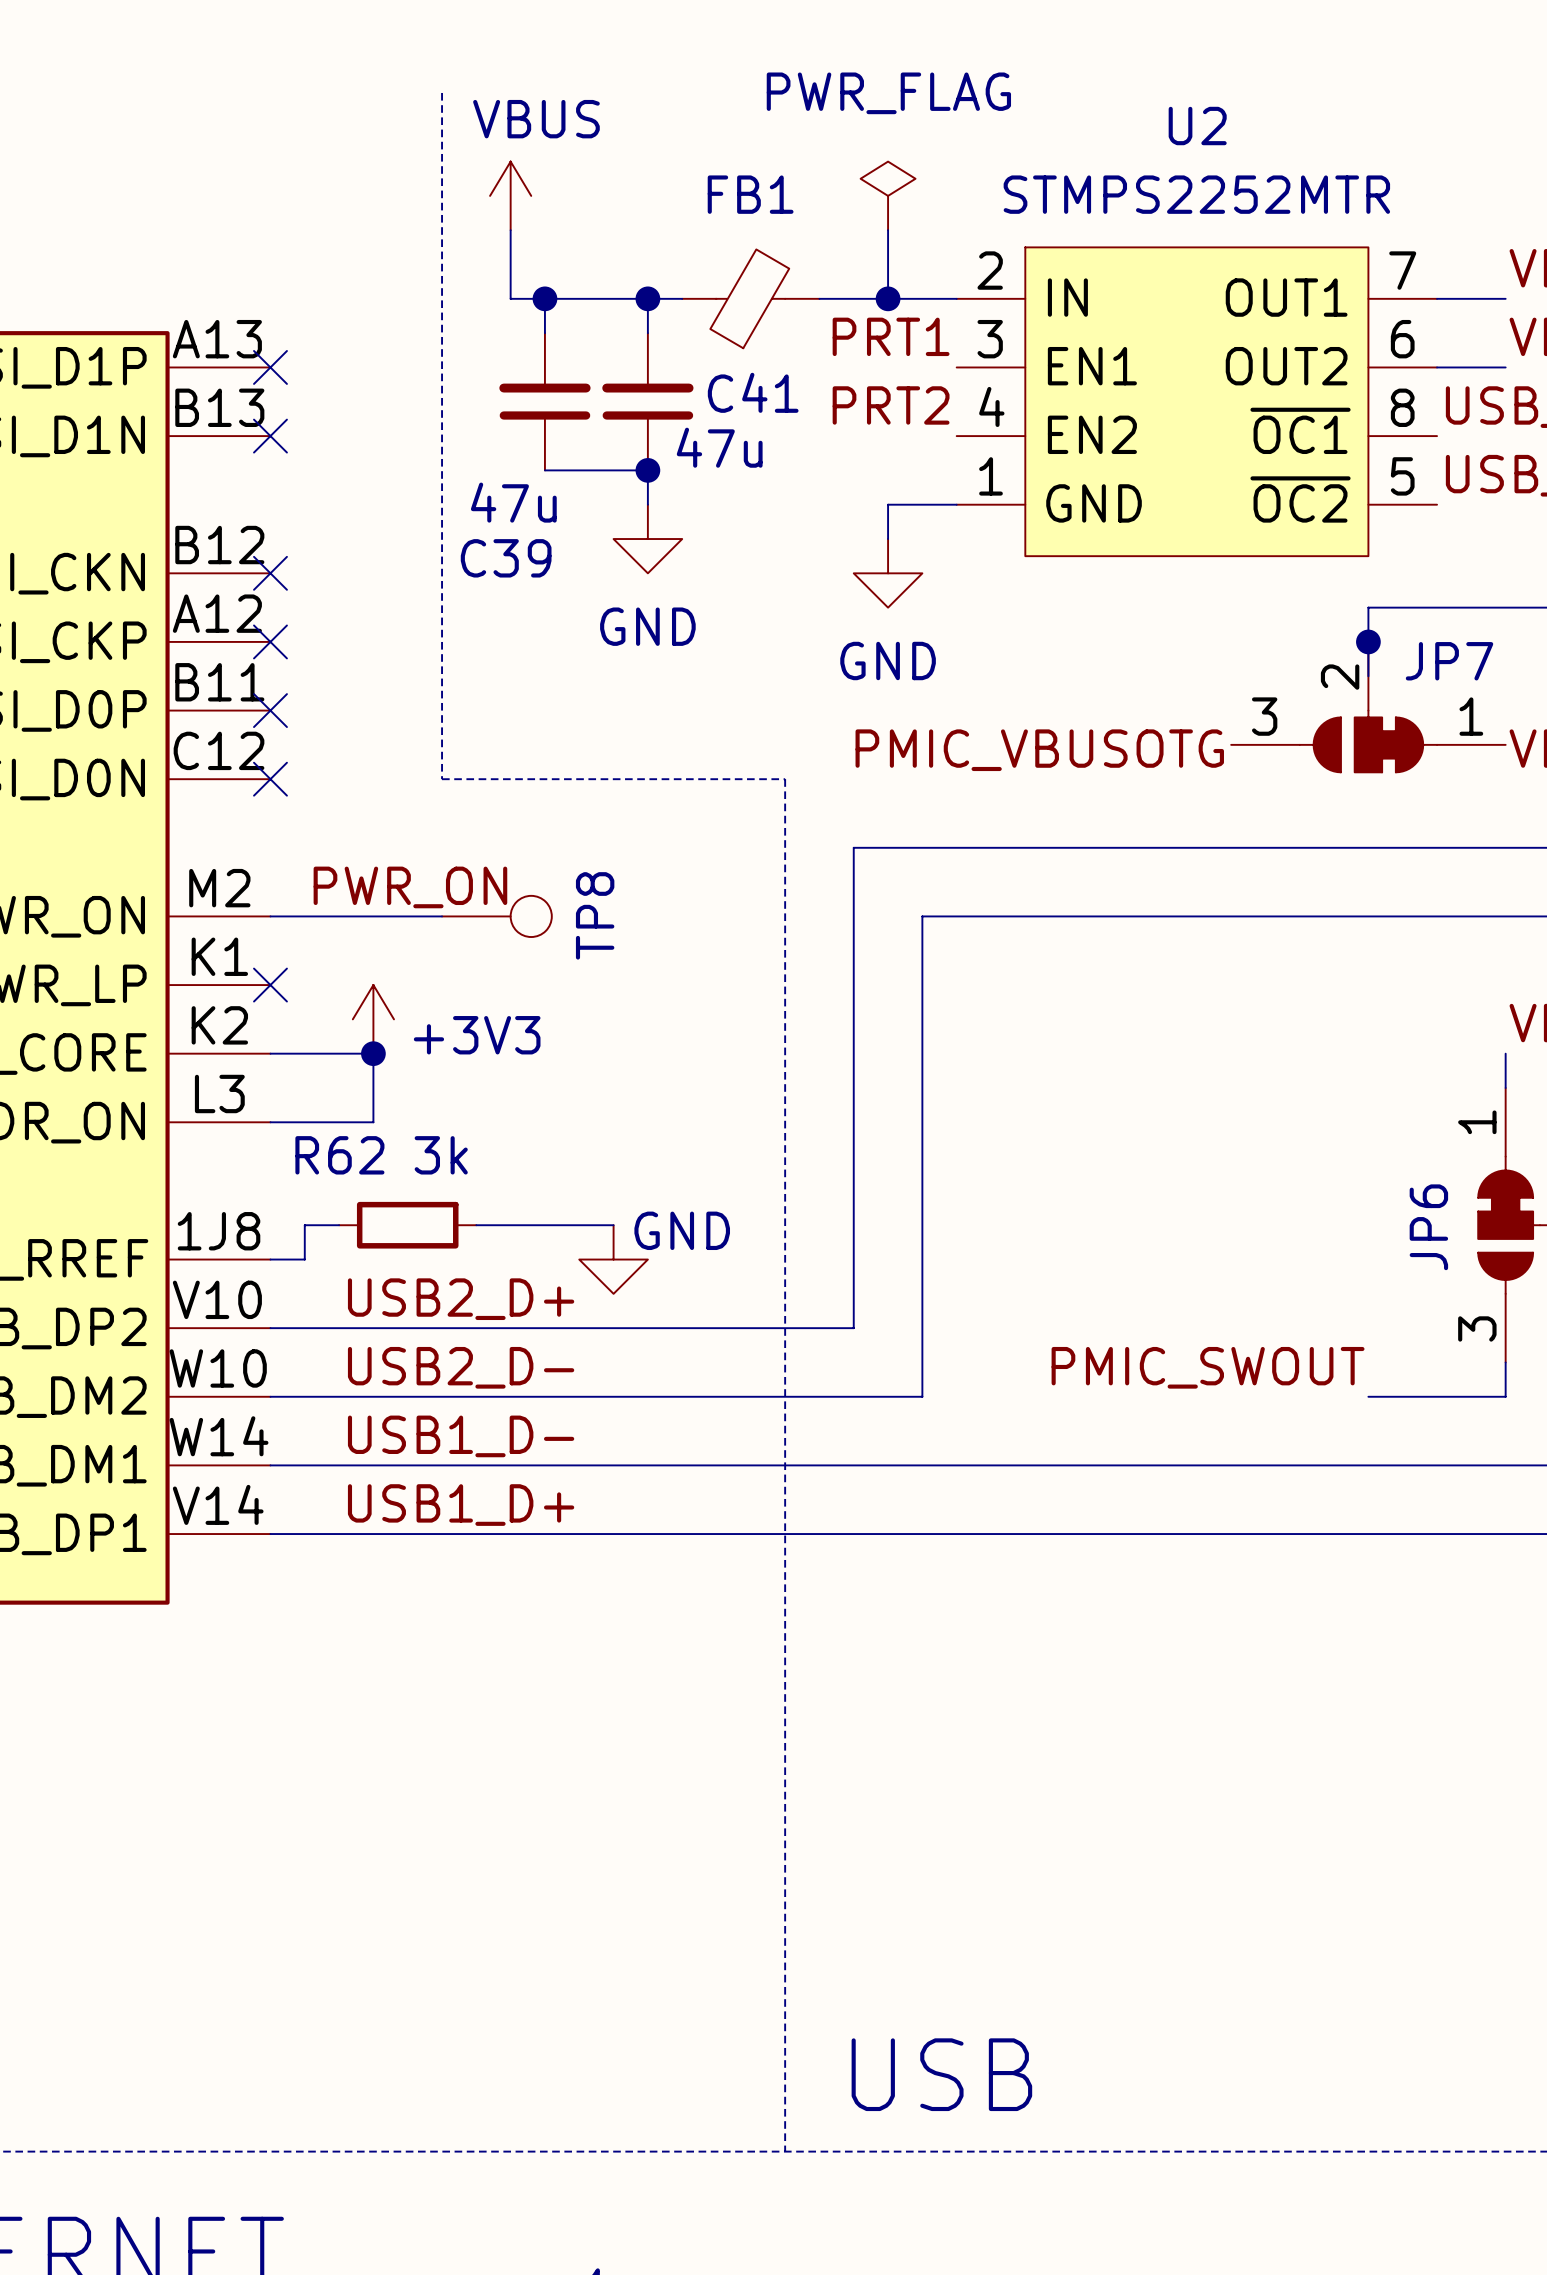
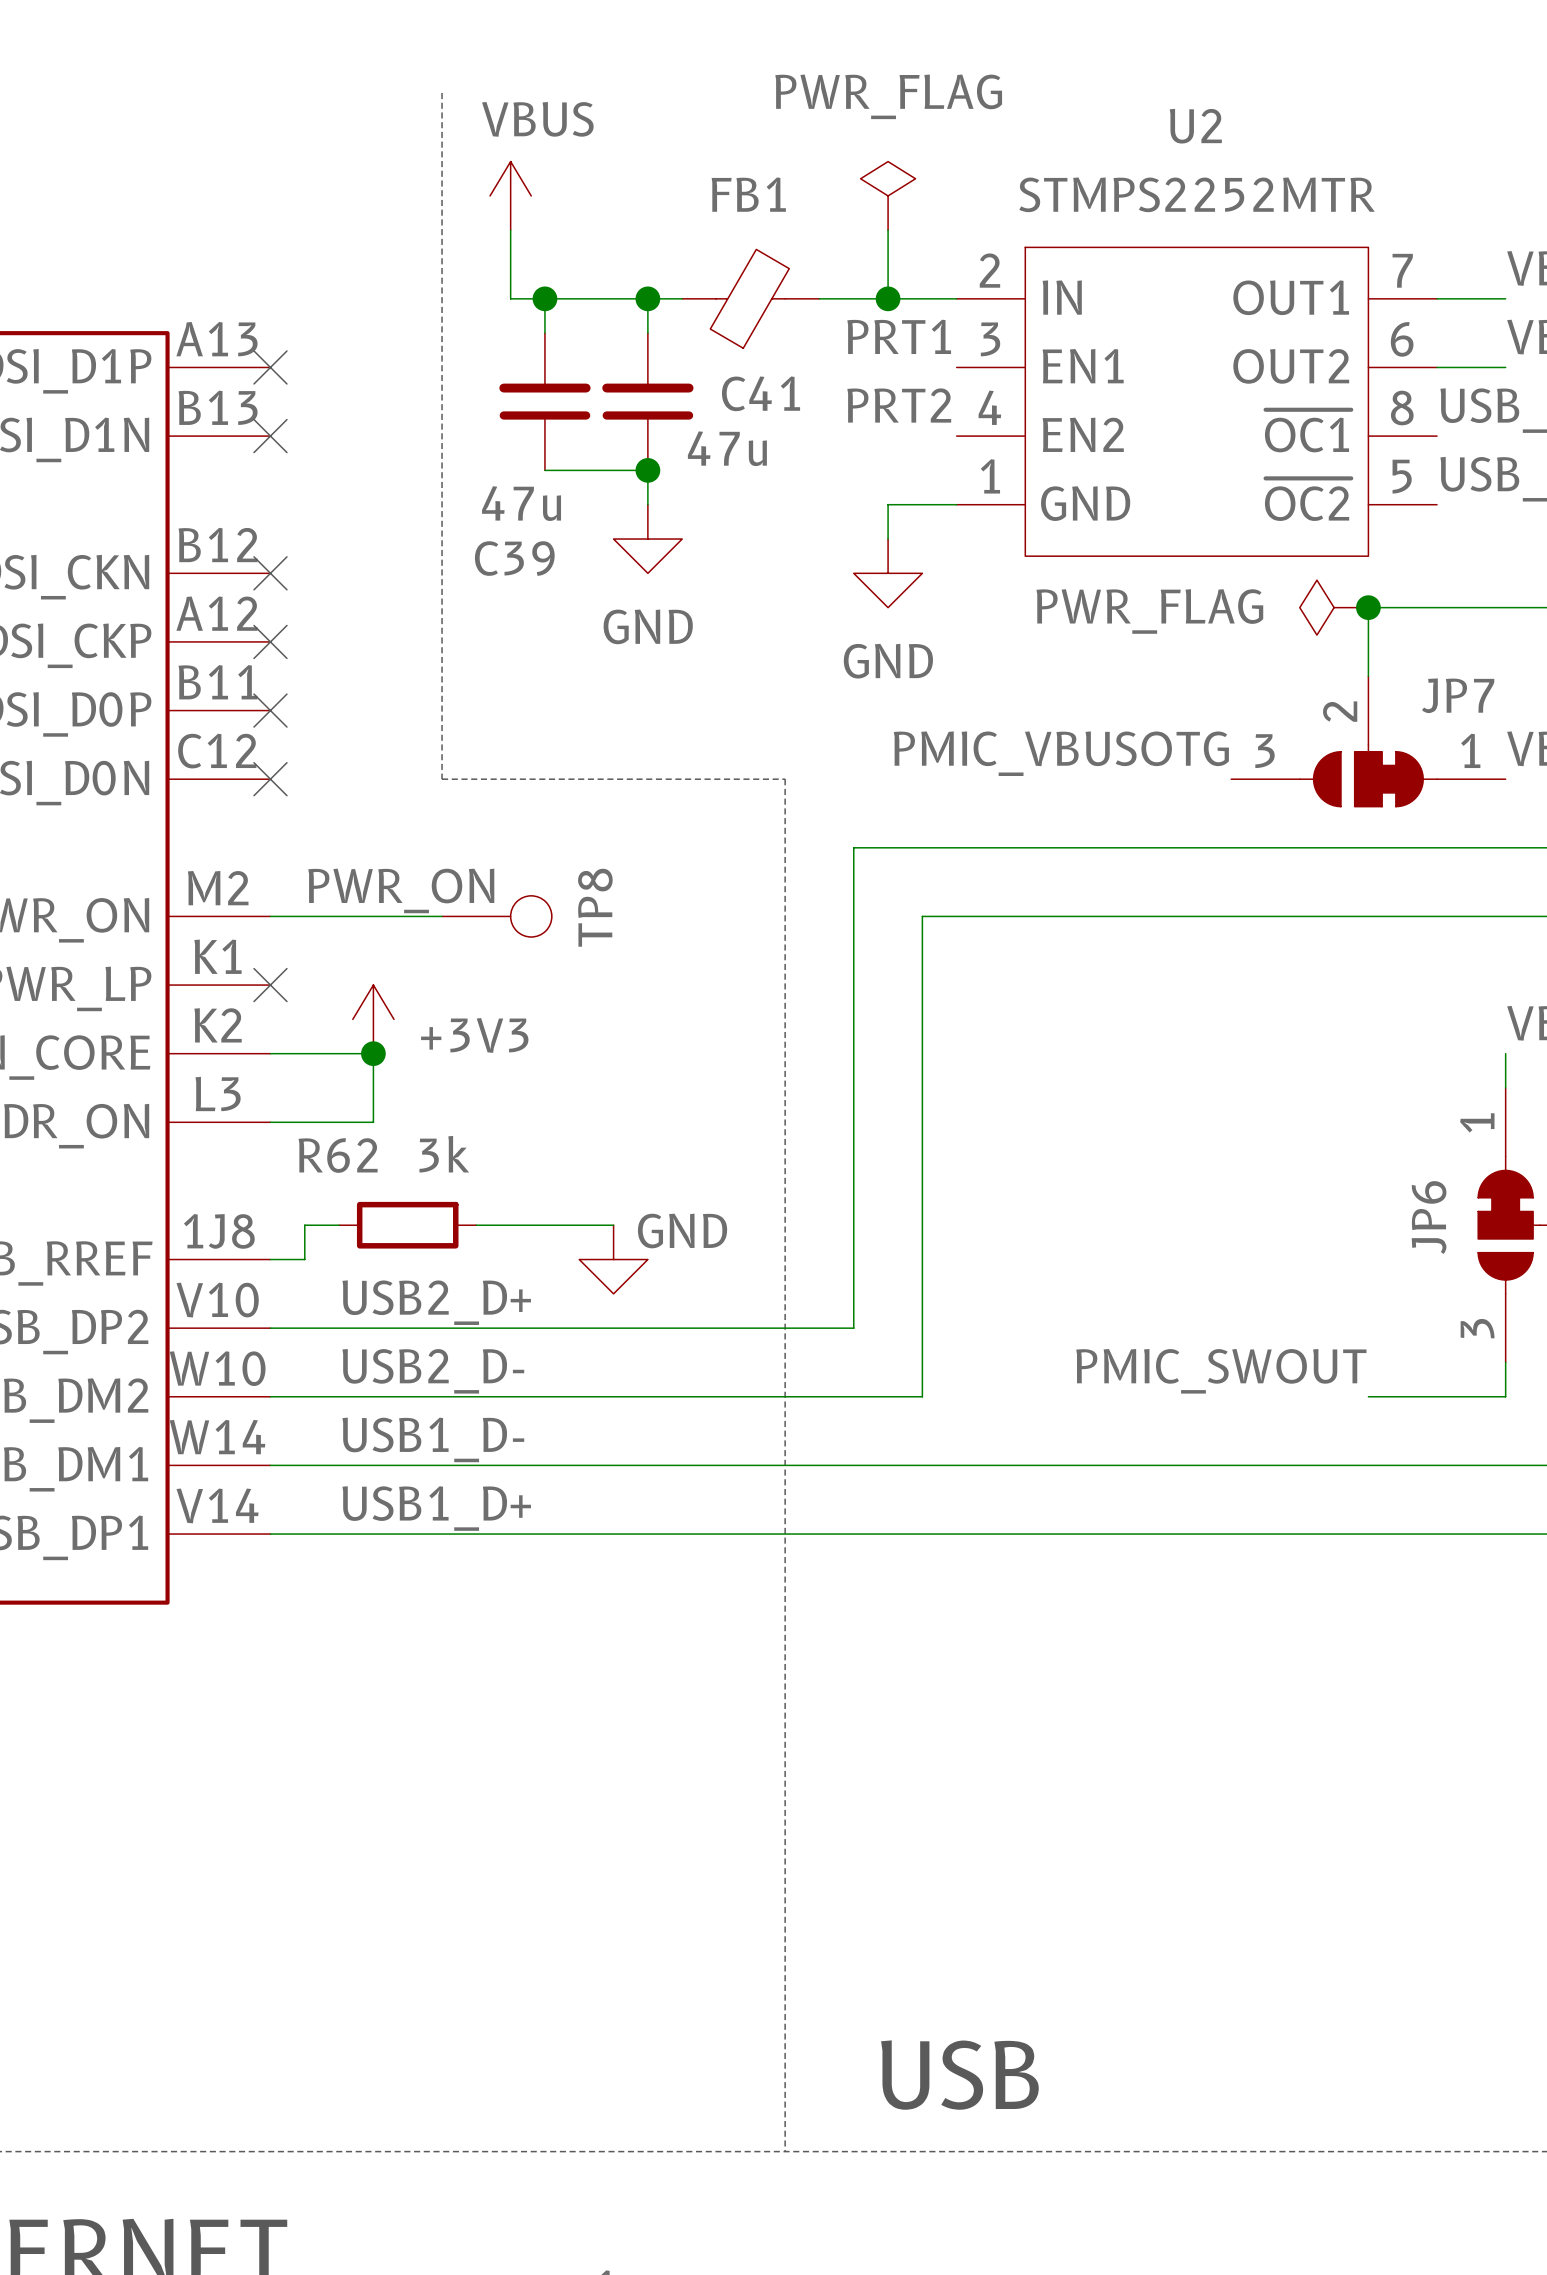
power symbol: none -> PWR_FLAG (1334, 607)
junction position: (1368, 641) -> (1368, 607)
JP7 position: (1368, 707) -> (1368, 741)

